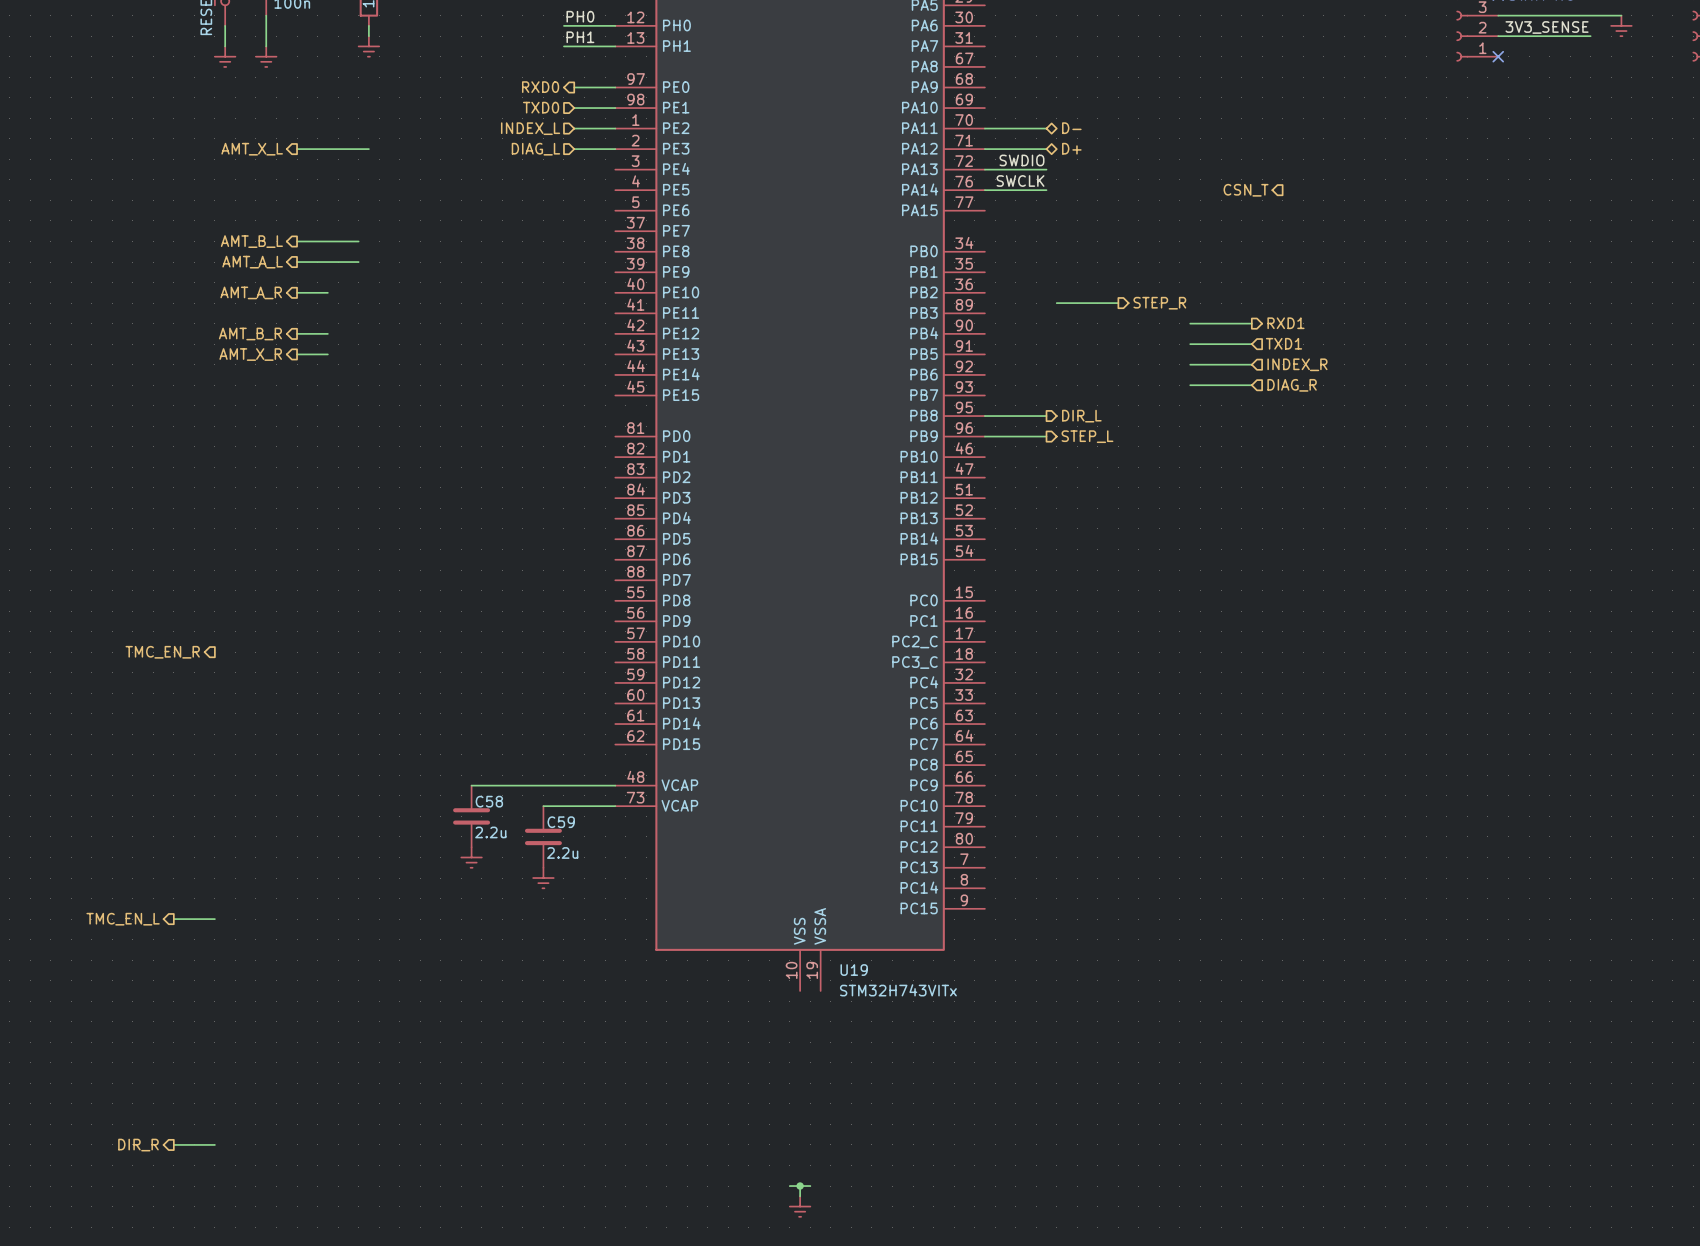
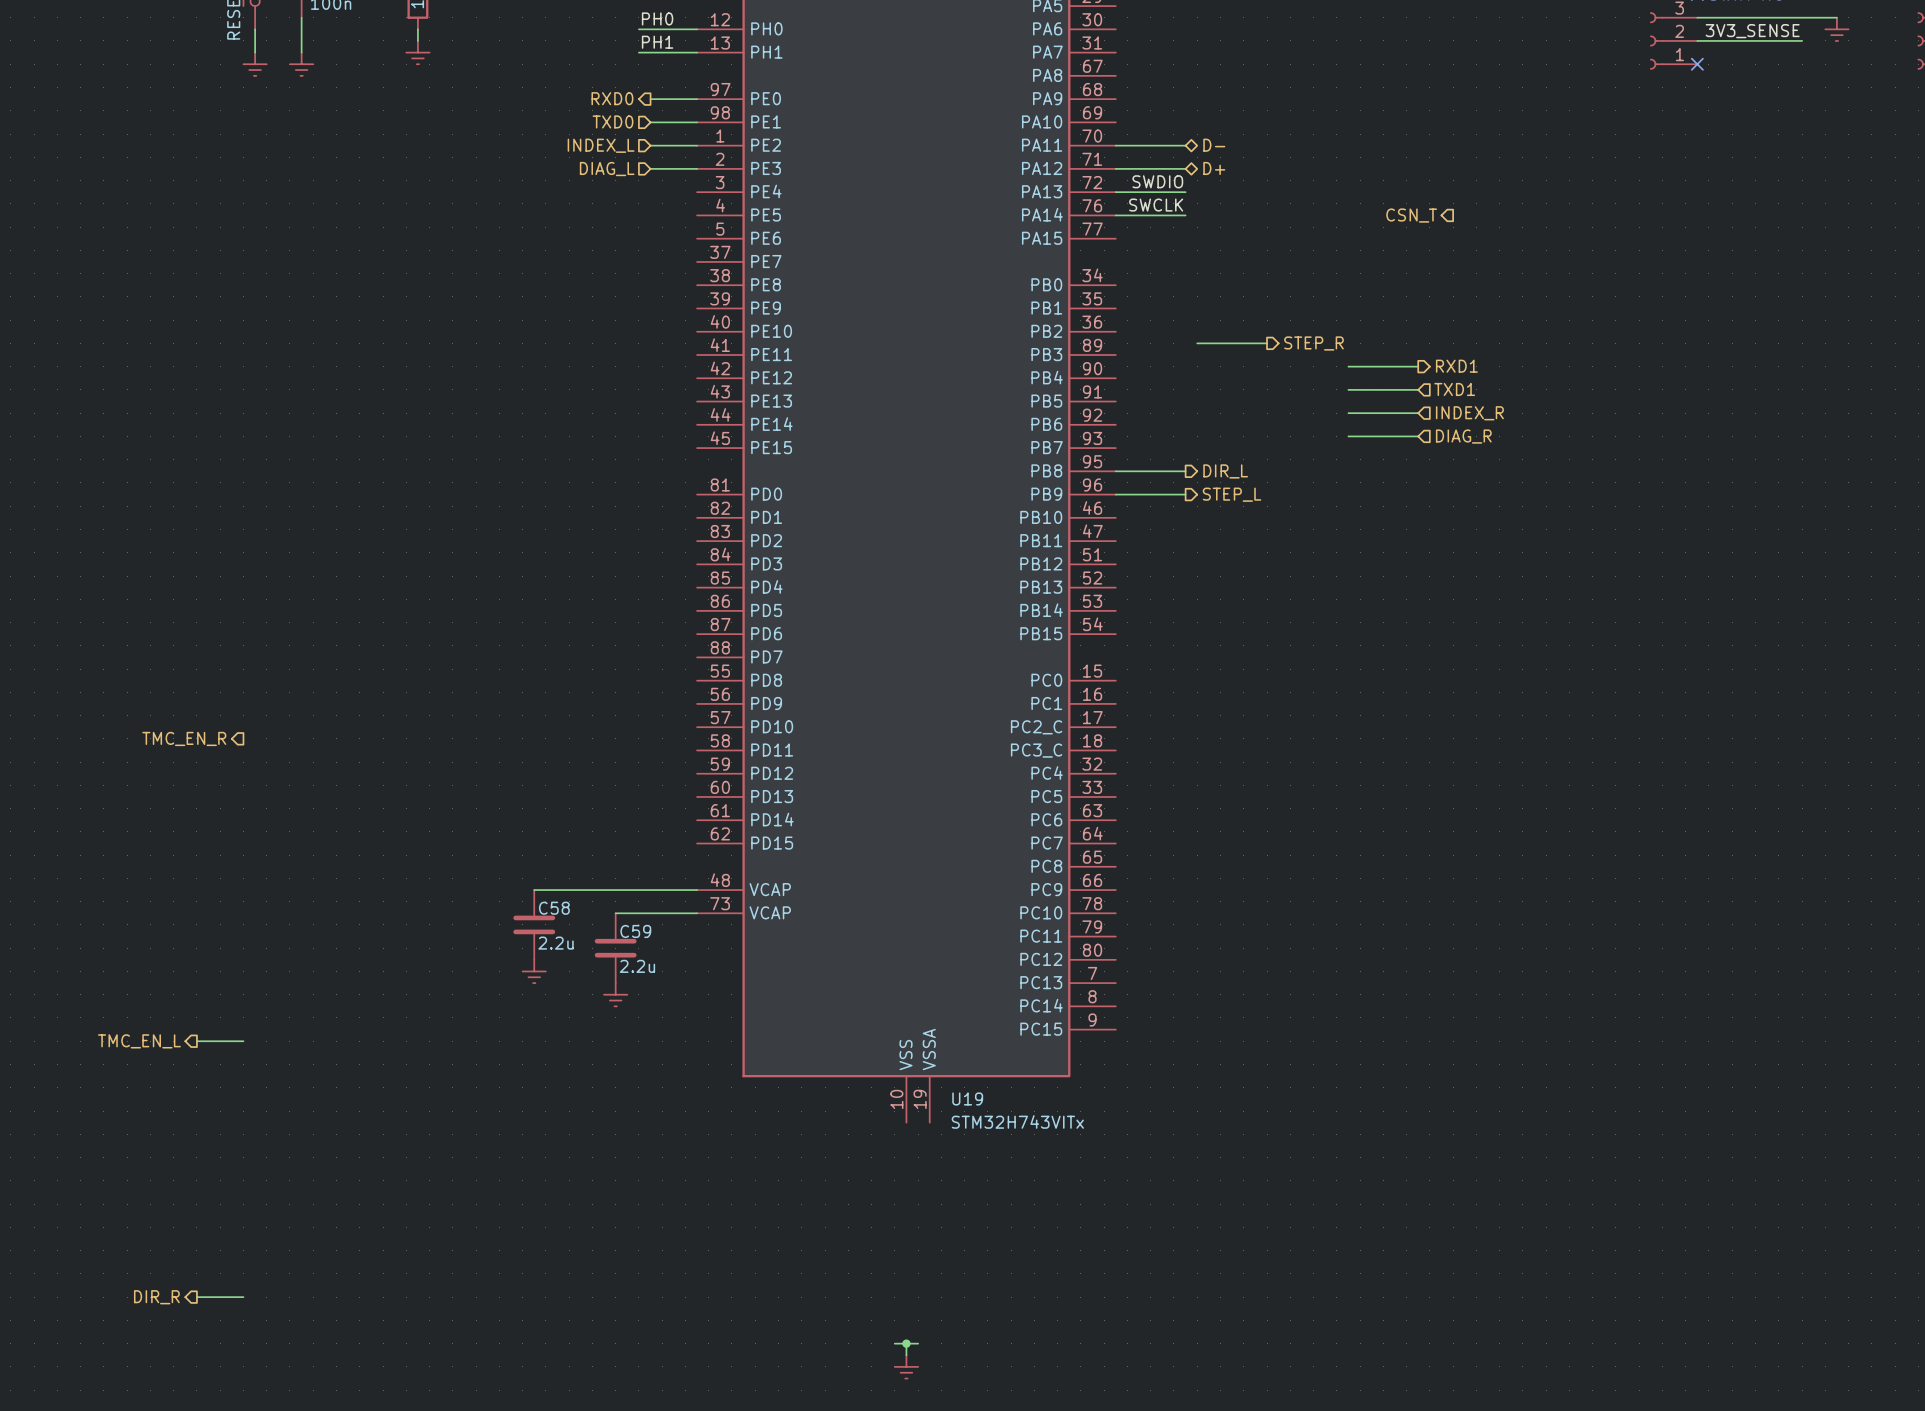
hierarchical label: AMT_X_L (252, 149) -> none
wire: (297, 149) (368, 149) -> none
hierarchical label: AMT_B_L (251, 241) -> none
wire: (297, 241) (358, 241) -> none
hierarchical label: AMT_A_L (252, 262) -> none
wire: (297, 262) (358, 262) -> none
hierarchical label: AMT_A_R (251, 292) -> none
wire: (297, 292) (327, 292) -> none
wire: (297, 333) (327, 333) -> none
hierarchical label: AMT_B_R (250, 334) -> none
hierarchical label: AMT_X_R (250, 354) -> none
wire: (297, 354) (327, 354) -> none

